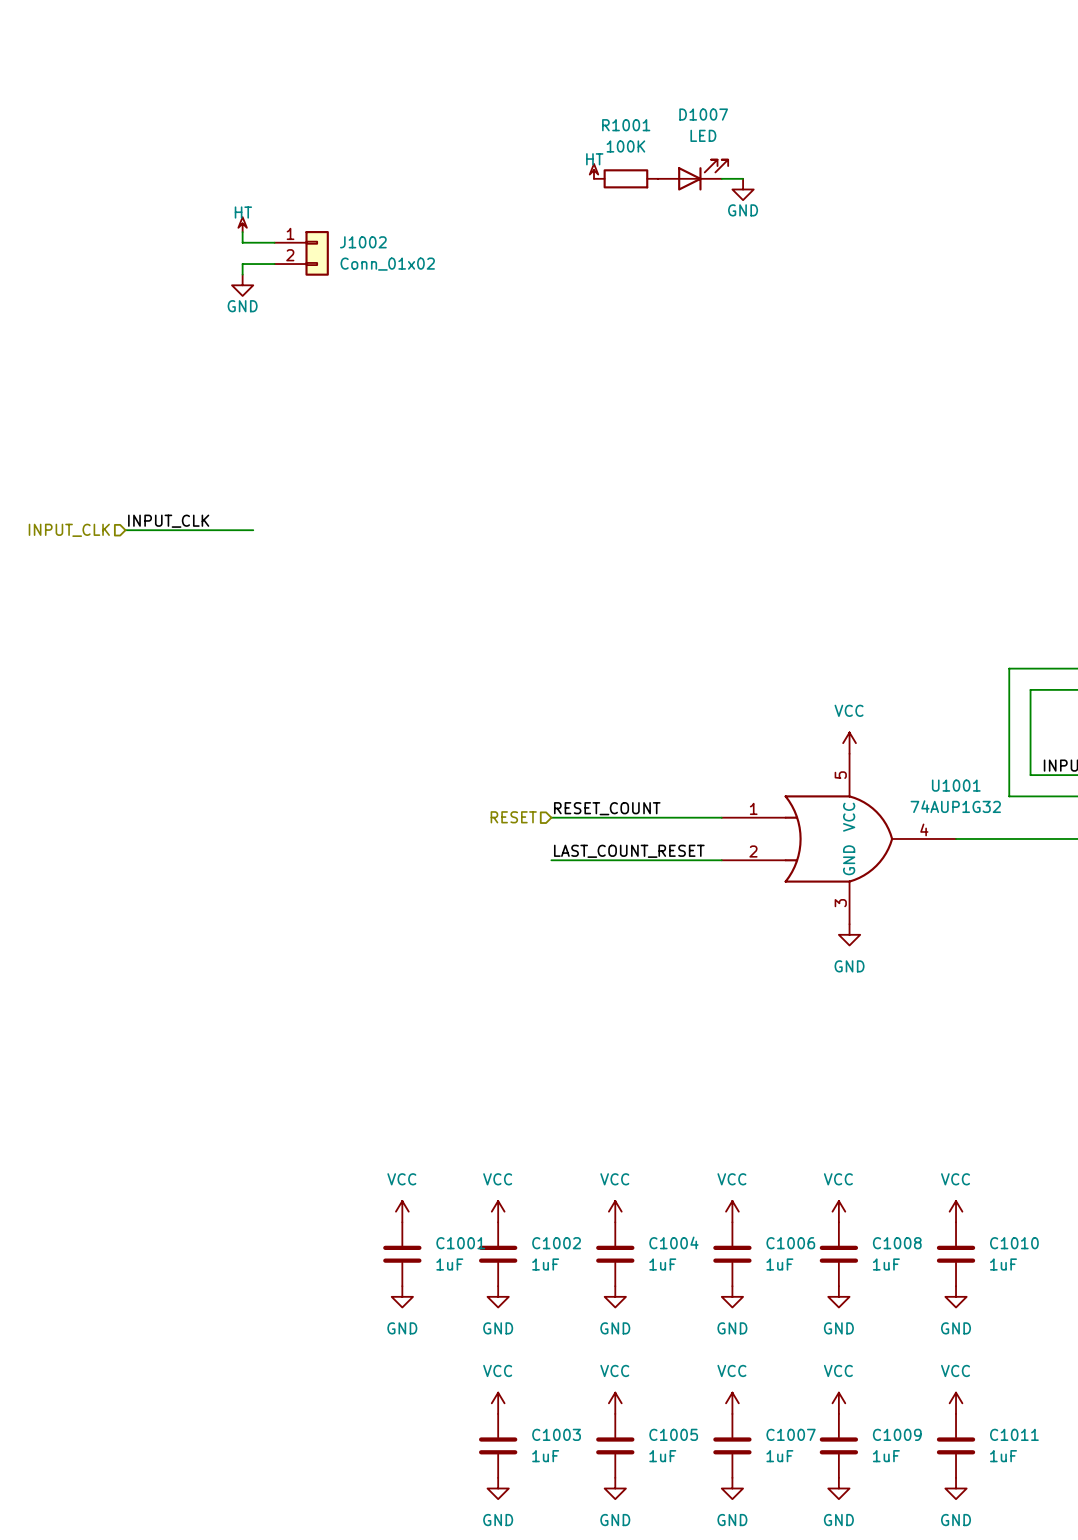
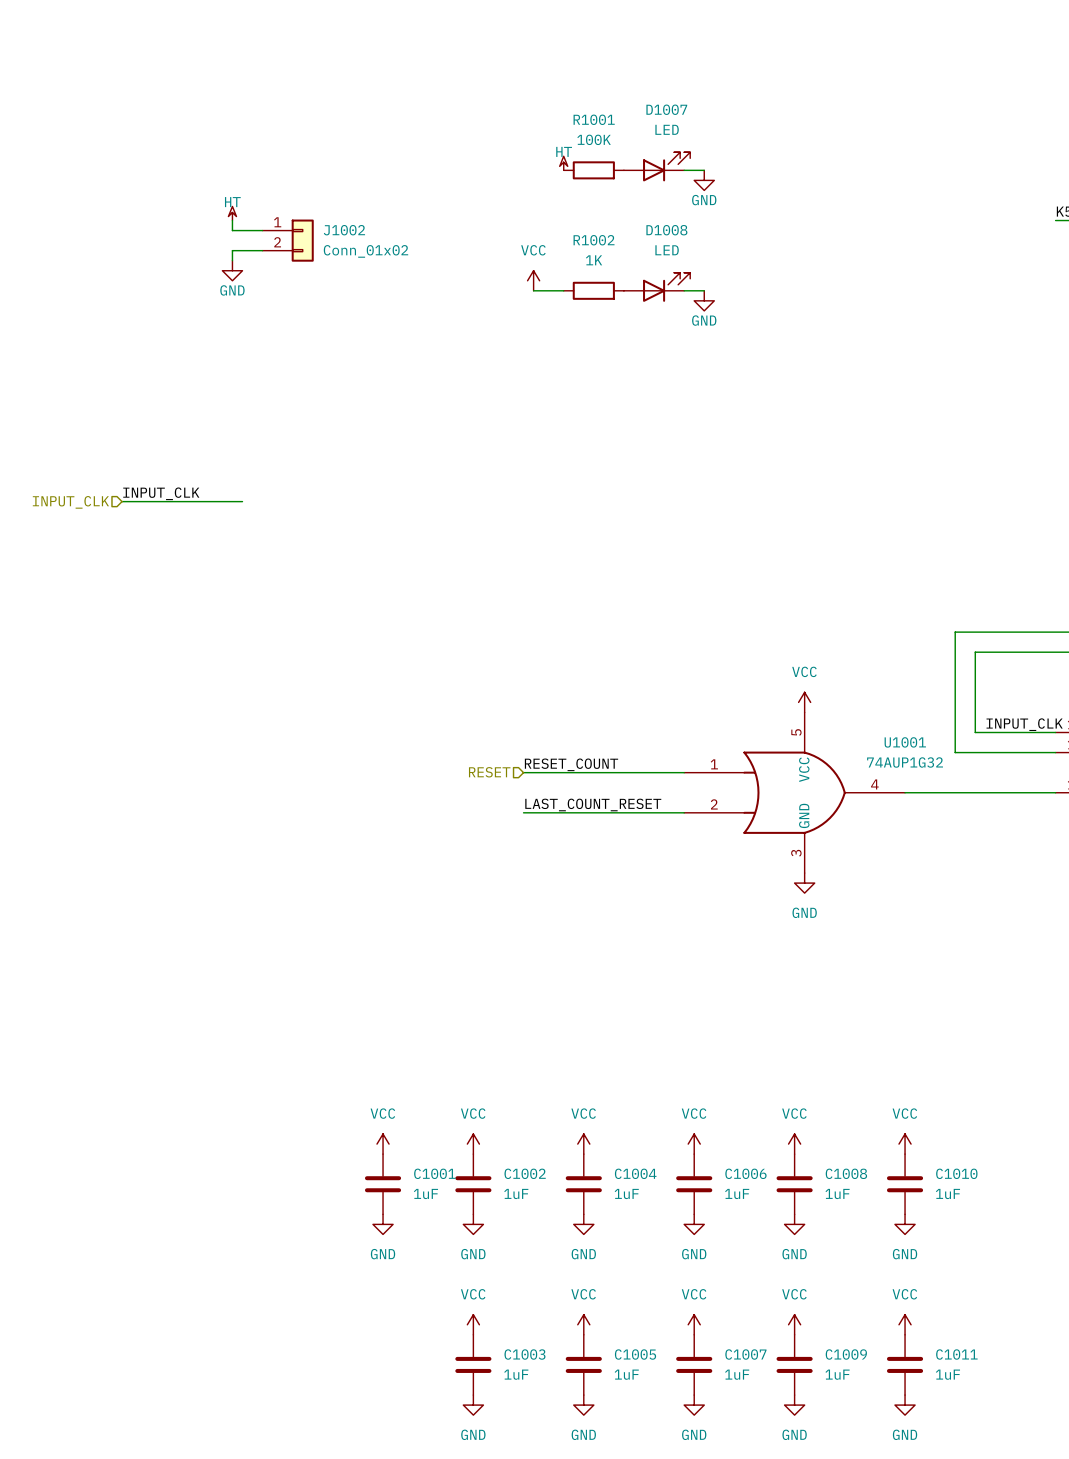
power symbol: none -> VCC (533, 280)
D1008: none -> LED (657, 287)
wire: none -> (533, 290) (563, 290)
R1002: none -> 1K (593, 290)
wire: none -> (684, 290) (704, 290)
power symbol: none -> GND (704, 300)

